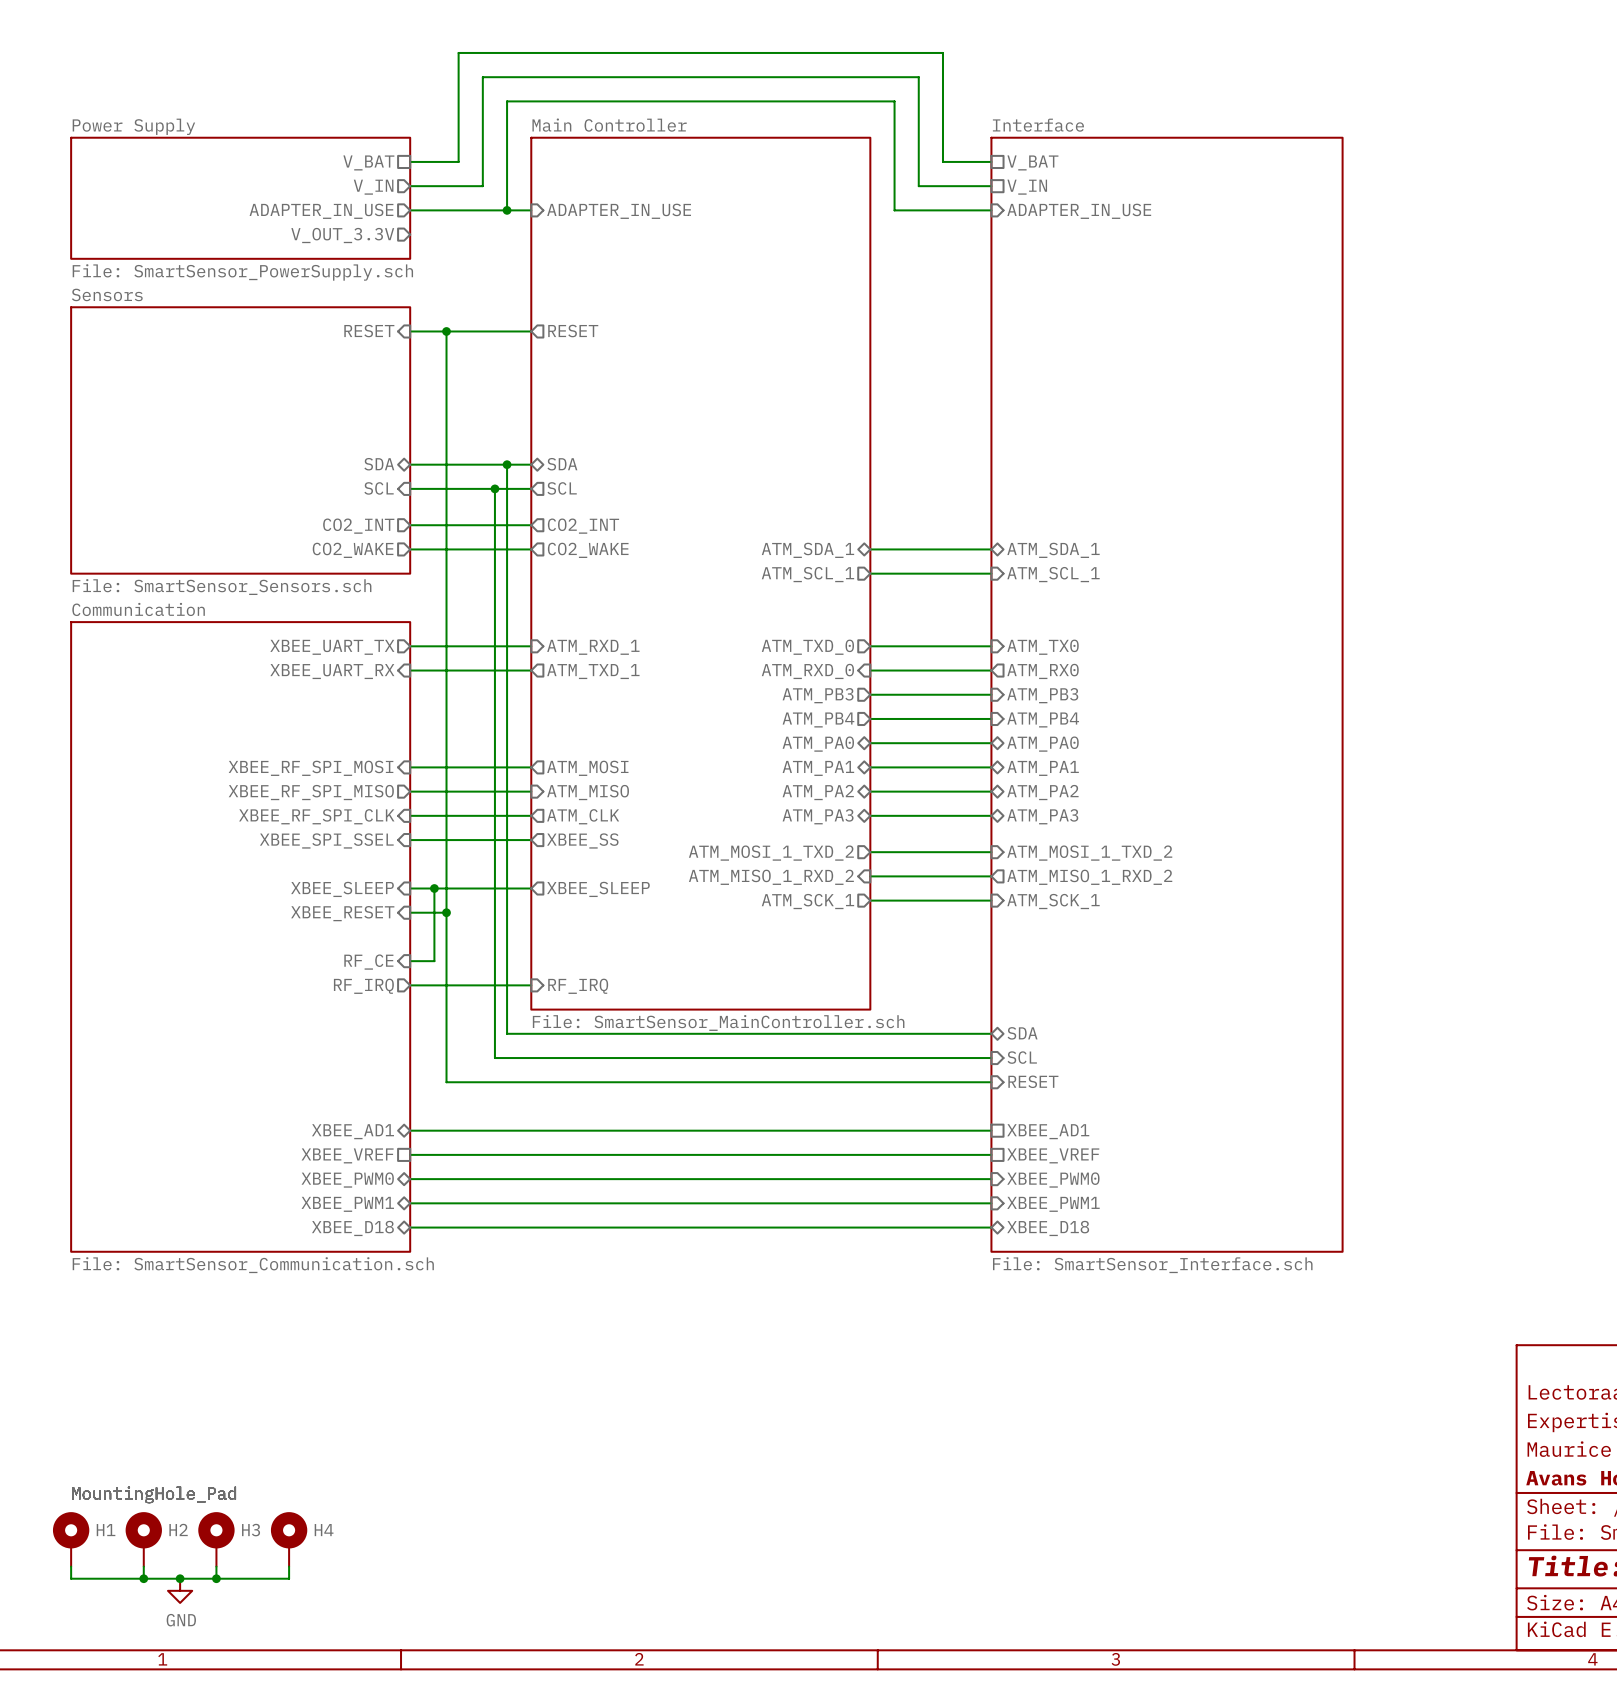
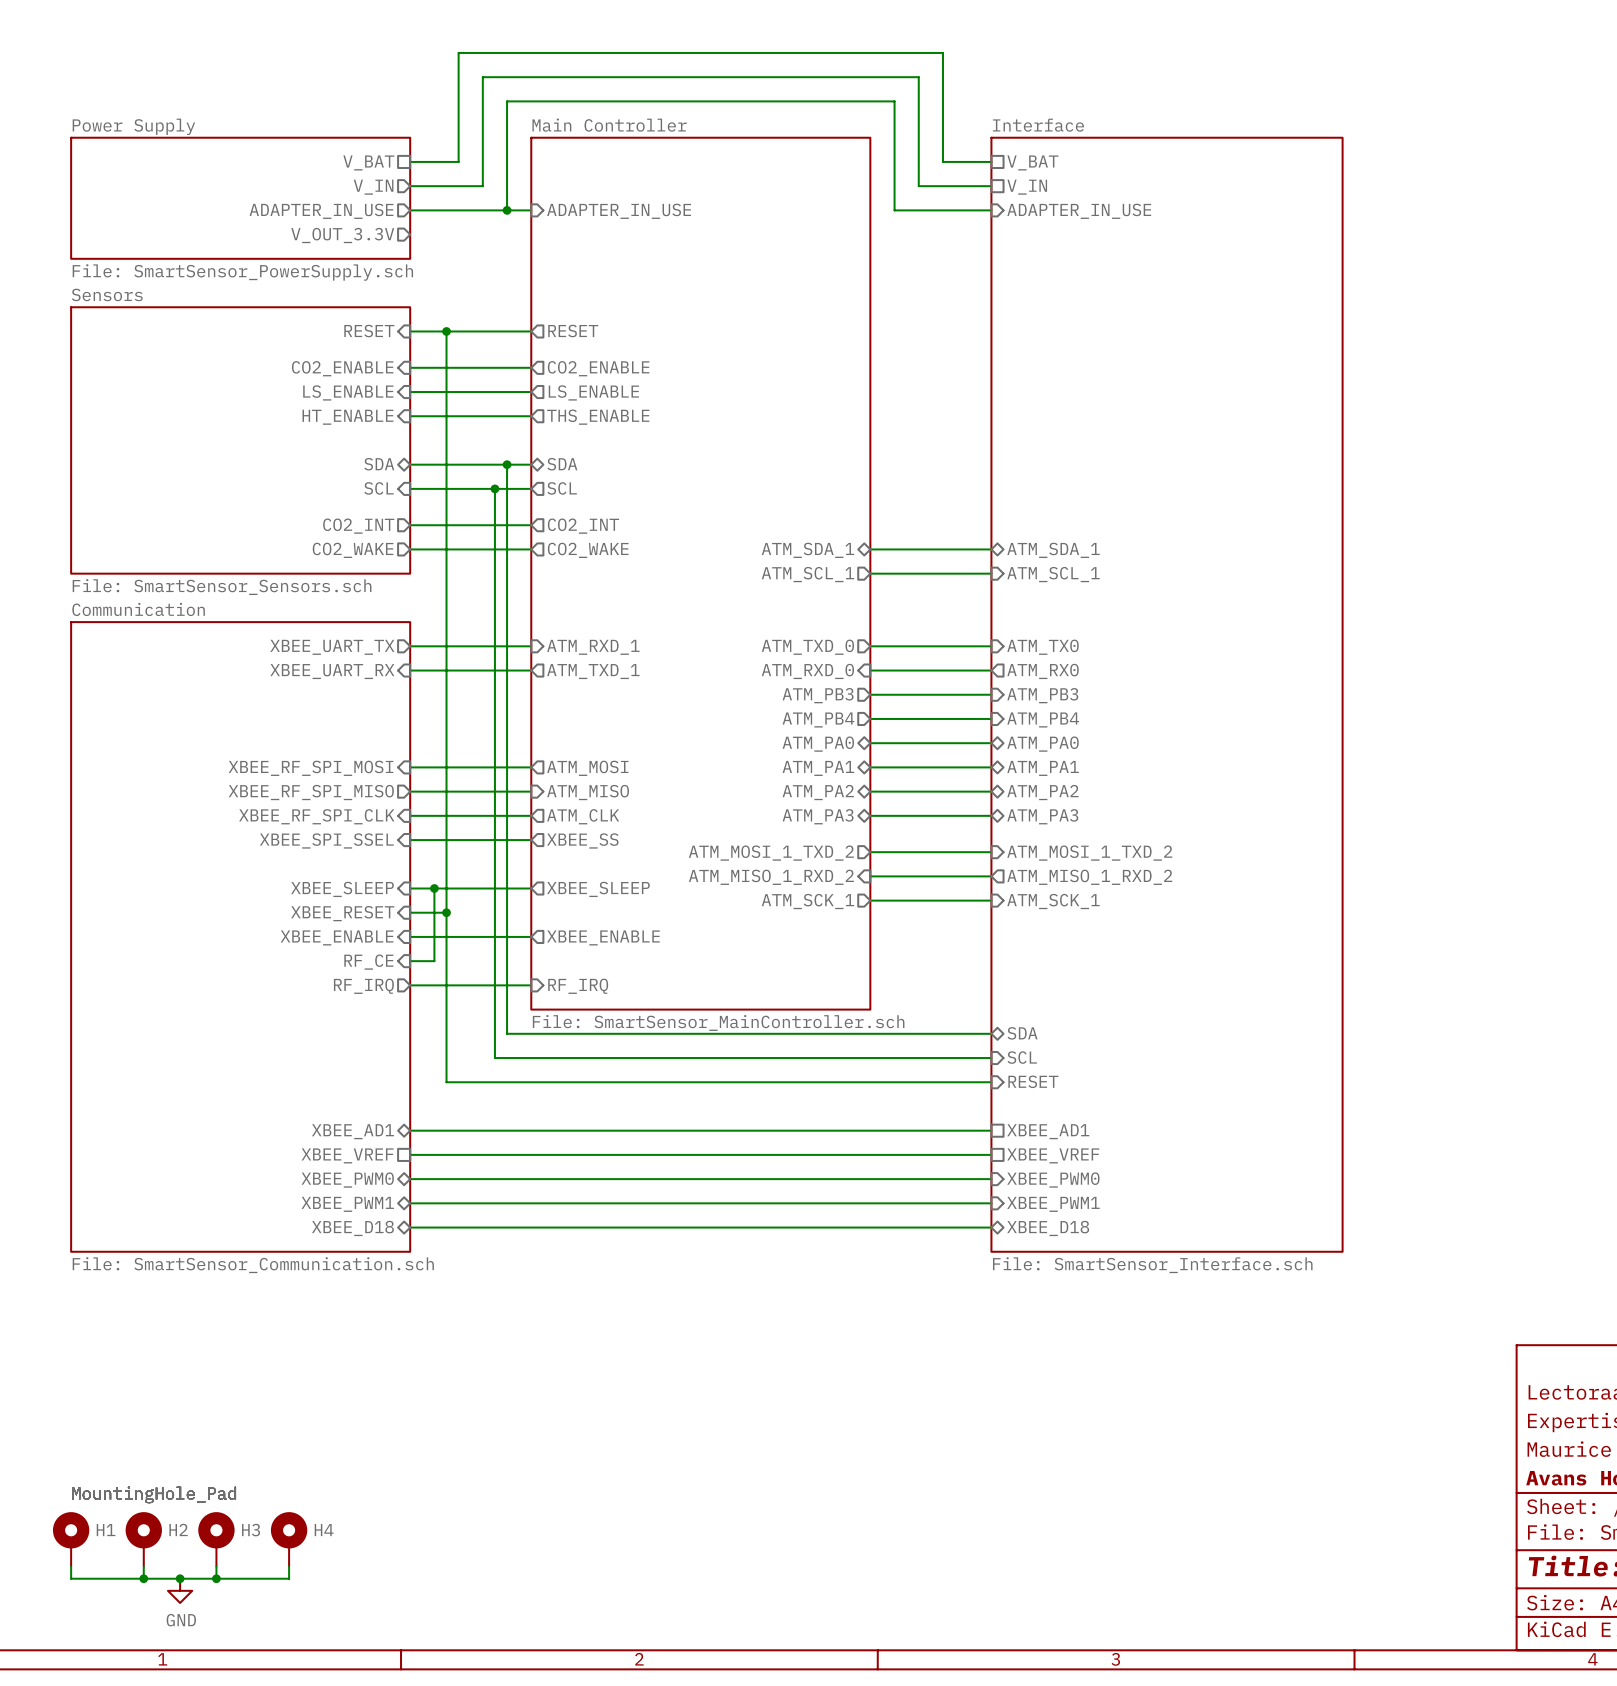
wire: none -> (410, 367) (531, 367)
sheet pin: none -> CO2_ENABLE (342, 368)
sheet pin: none -> CO2_ENABLE (598, 368)
sheet pin: none -> LS_ENABLE (348, 392)
wire: none -> (410, 392) (531, 392)
sheet pin: none -> LS_ENABLE (593, 392)
wire: none -> (410, 416) (531, 416)
sheet pin: none -> HT_ENABLE (347, 417)
sheet pin: none -> THS_ENABLE (598, 417)
wire: none -> (410, 936) (531, 936)
sheet pin: none -> XBEE_ENABLE (337, 937)
sheet pin: none -> XBEE_ENABLE (603, 937)

